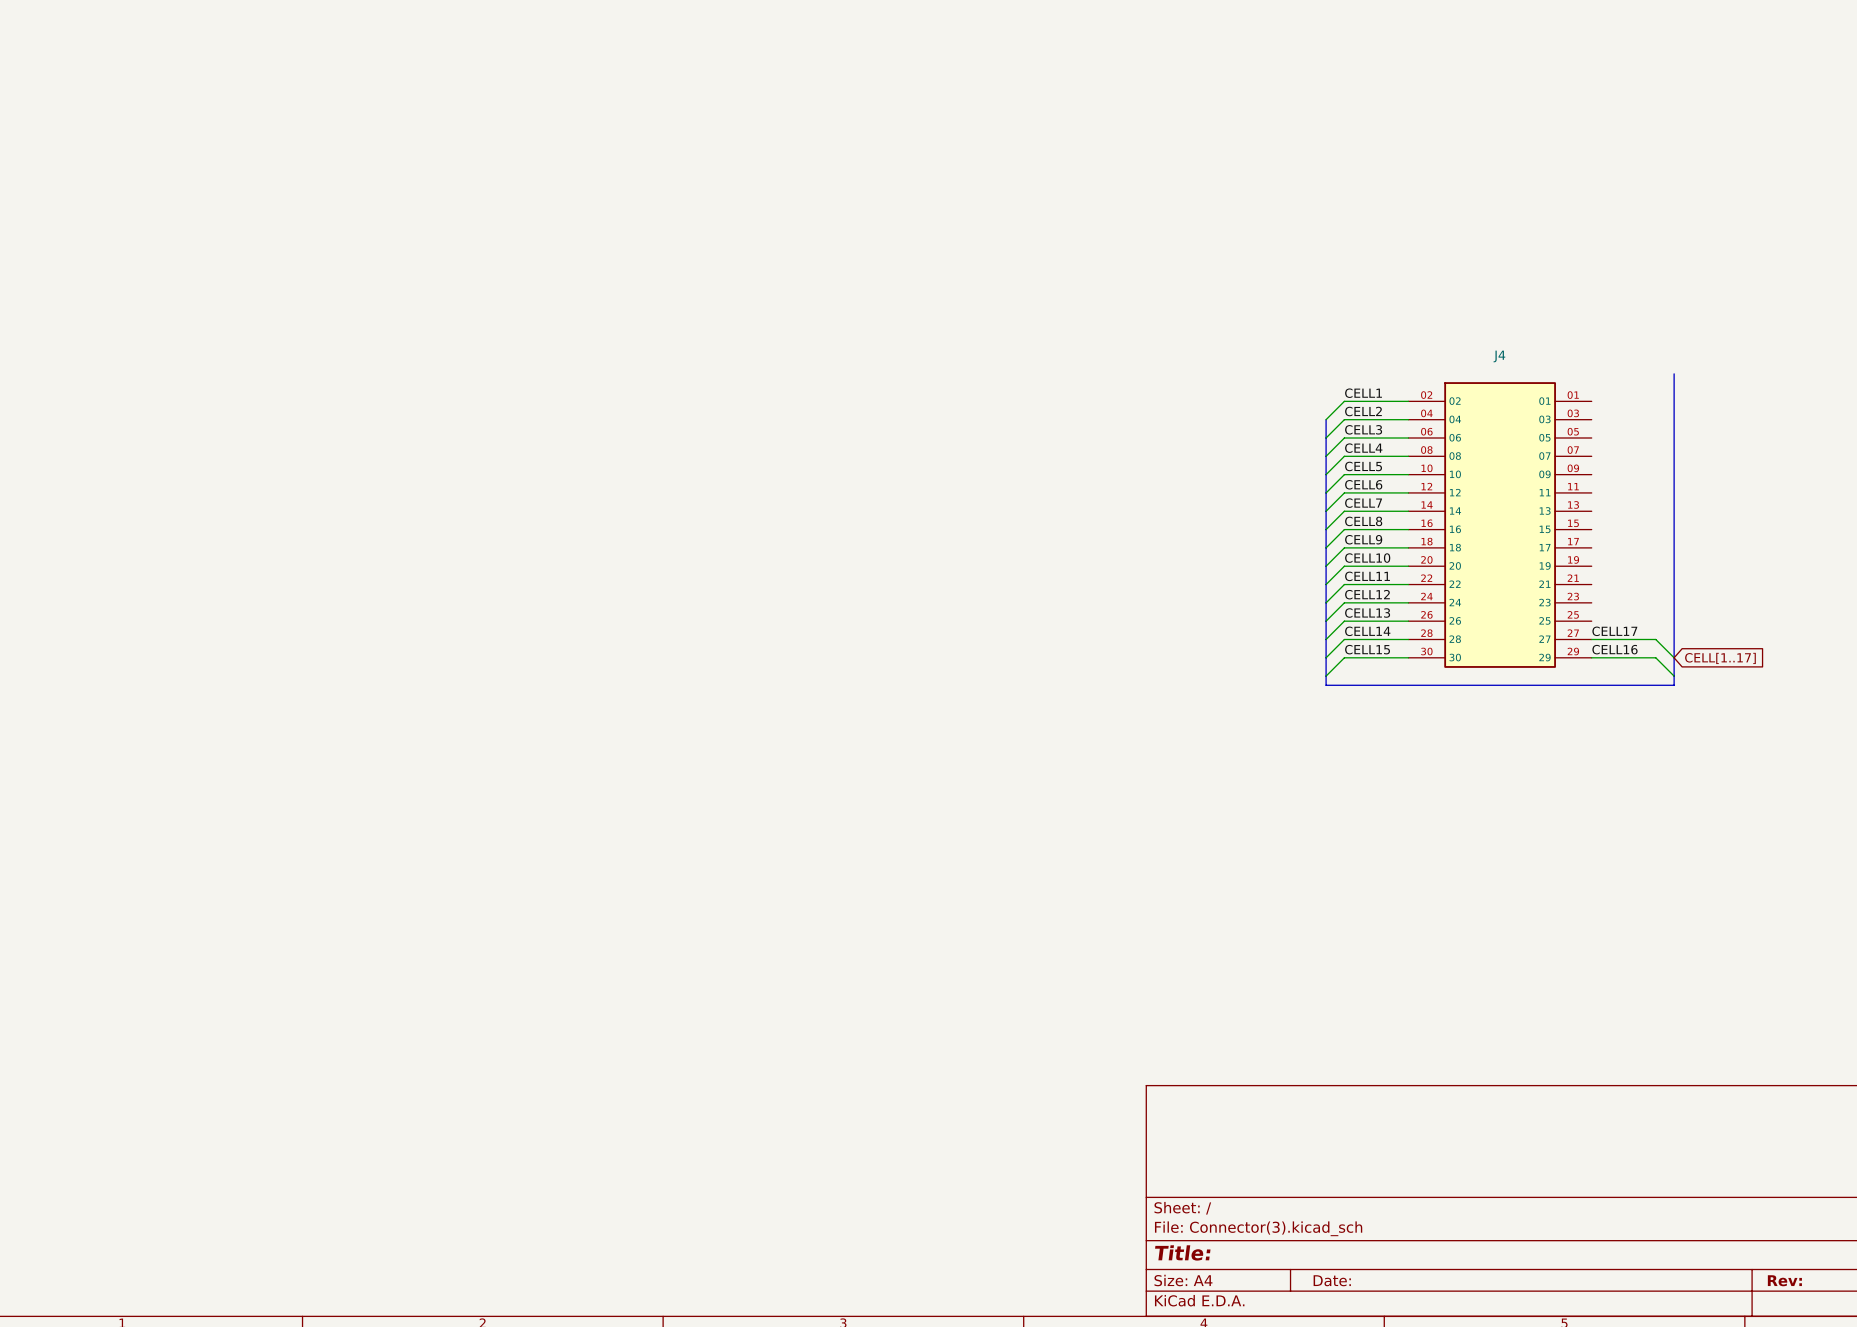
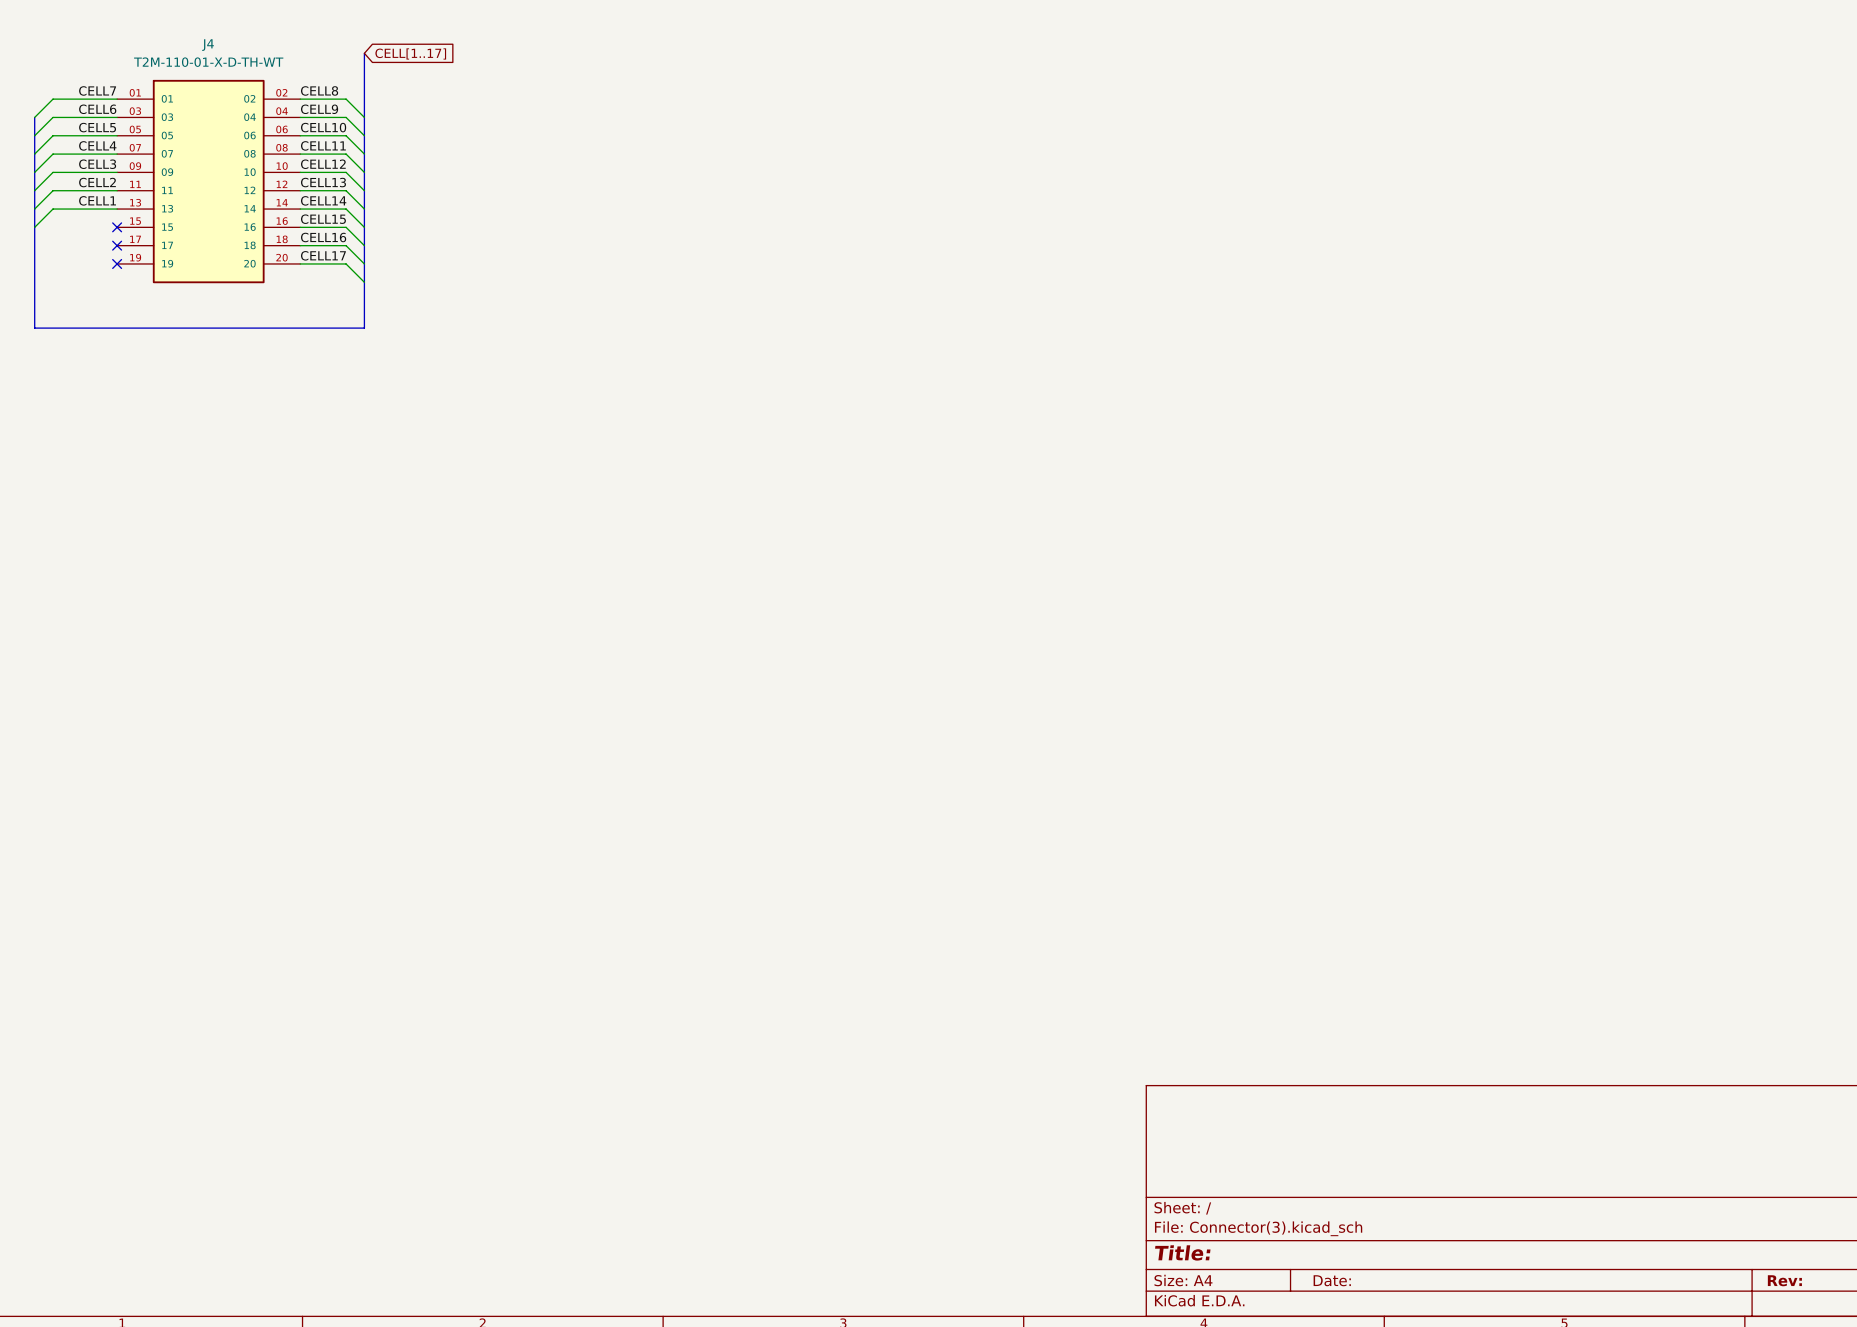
bus: none -> (364, 53) (364, 328) (34, 328) (34, 117)
global label: none -> CELL[1..17] (410, 53)
J4 value: none -> T2M-110-01-X-D-TH-WT (208, 62)
label: none -> CELL7 (97, 90)
label: none -> CELL8 (319, 90)
wire: none -> (117, 99) (53, 99) (34, 117)
wire: none -> (300, 99) (346, 99) (364, 117)
label: none -> CELL6 (97, 109)
label: none -> CELL9 (319, 109)
wire: none -> (117, 117) (53, 117) (34, 135)
wire: none -> (300, 117) (346, 117) (364, 135)
label: none -> CELL5 (97, 127)
label: none -> CELL10 (323, 127)
wire: none -> (117, 135) (53, 135) (34, 154)
wire: none -> (300, 135) (346, 135) (364, 154)
label: none -> CELL4 (97, 145)
label: none -> CELL11 (323, 145)
wire: none -> (117, 154) (53, 154) (34, 172)
wire: none -> (300, 154) (346, 154) (364, 172)
label: none -> CELL3 (97, 164)
label: none -> CELL12 (323, 164)
wire: none -> (117, 172) (53, 172) (34, 190)
wire: none -> (300, 172) (346, 172) (364, 190)
label: none -> CELL2 (97, 182)
label: none -> CELL13 (323, 182)
wire: none -> (117, 190) (53, 190) (34, 209)
wire: none -> (300, 190) (346, 190) (364, 209)
label: none -> CELL1 (97, 200)
label: none -> CELL14 (323, 200)
wire: none -> (117, 209) (53, 209) (34, 227)
wire: none -> (300, 209) (346, 209) (364, 227)
label: none -> CELL15 (323, 219)
no-connect mark: none -> (117, 227)
wire: none -> (300, 227) (346, 227) (364, 245)
label: none -> CELL16 (323, 237)
no-connect mark: none -> (117, 245)
wire: none -> (300, 245) (346, 245) (364, 263)
label: none -> CELL17 (323, 255)
no-connect mark: none -> (117, 263)
wire: none -> (300, 263) (346, 263) (364, 282)
J4 name position: J4 (1499, 356) -> J4 (208, 45)
bus: (1674, 373) (1674, 685) (1326, 685) (1326, 419) -> none
J4 symbol: [1408, 382, 1592, 668] -> [117, 79, 301, 284]
label: CELL1 (1363, 393) -> none
wire: (1408, 401) (1344, 401) (1326, 419) -> none
label: CELL2 (1363, 411) -> none
wire: (1408, 419) (1344, 419) (1326, 438) -> none
label: CELL3 (1363, 429) -> none
wire: (1408, 438) (1344, 438) (1326, 456) -> none
label: CELL4 (1363, 448) -> none
wire: (1408, 456) (1344, 456) (1326, 474) -> none
label: CELL5 (1363, 466) -> none
wire: (1408, 474) (1344, 474) (1326, 492) -> none
label: CELL6 (1363, 484) -> none
wire: (1408, 492) (1344, 492) (1326, 511) -> none
label: CELL7 (1363, 503) -> none
wire: (1408, 511) (1344, 511) (1326, 529) -> none
label: CELL8 (1363, 521) -> none
wire: (1408, 529) (1344, 529) (1326, 547) -> none
label: CELL9 (1363, 539) -> none
wire: (1408, 547) (1344, 547) (1326, 566) -> none
label: CELL10 (1367, 558) -> none
wire: (1408, 566) (1344, 566) (1326, 584) -> none
label: CELL11 (1367, 576) -> none
wire: (1408, 584) (1344, 584) (1326, 602) -> none
label: CELL12 (1367, 594) -> none
wire: (1408, 602) (1344, 602) (1326, 621) -> none
label: CELL13 (1367, 613) -> none
wire: (1408, 621) (1344, 621) (1326, 639) -> none
label: CELL14 (1367, 631) -> none
label: CELL17 (1614, 631) -> none
wire: (1408, 639) (1344, 639) (1326, 657) -> none
wire: (1591, 639) (1655, 639) (1674, 657) -> none
label: CELL15 (1367, 649) -> none
label: CELL16 (1614, 649) -> none
wire: (1408, 657) (1344, 657) (1326, 676) -> none
wire: (1591, 657) (1655, 657) (1674, 676) -> none
global label: CELL[1..17] (1720, 658) -> none

